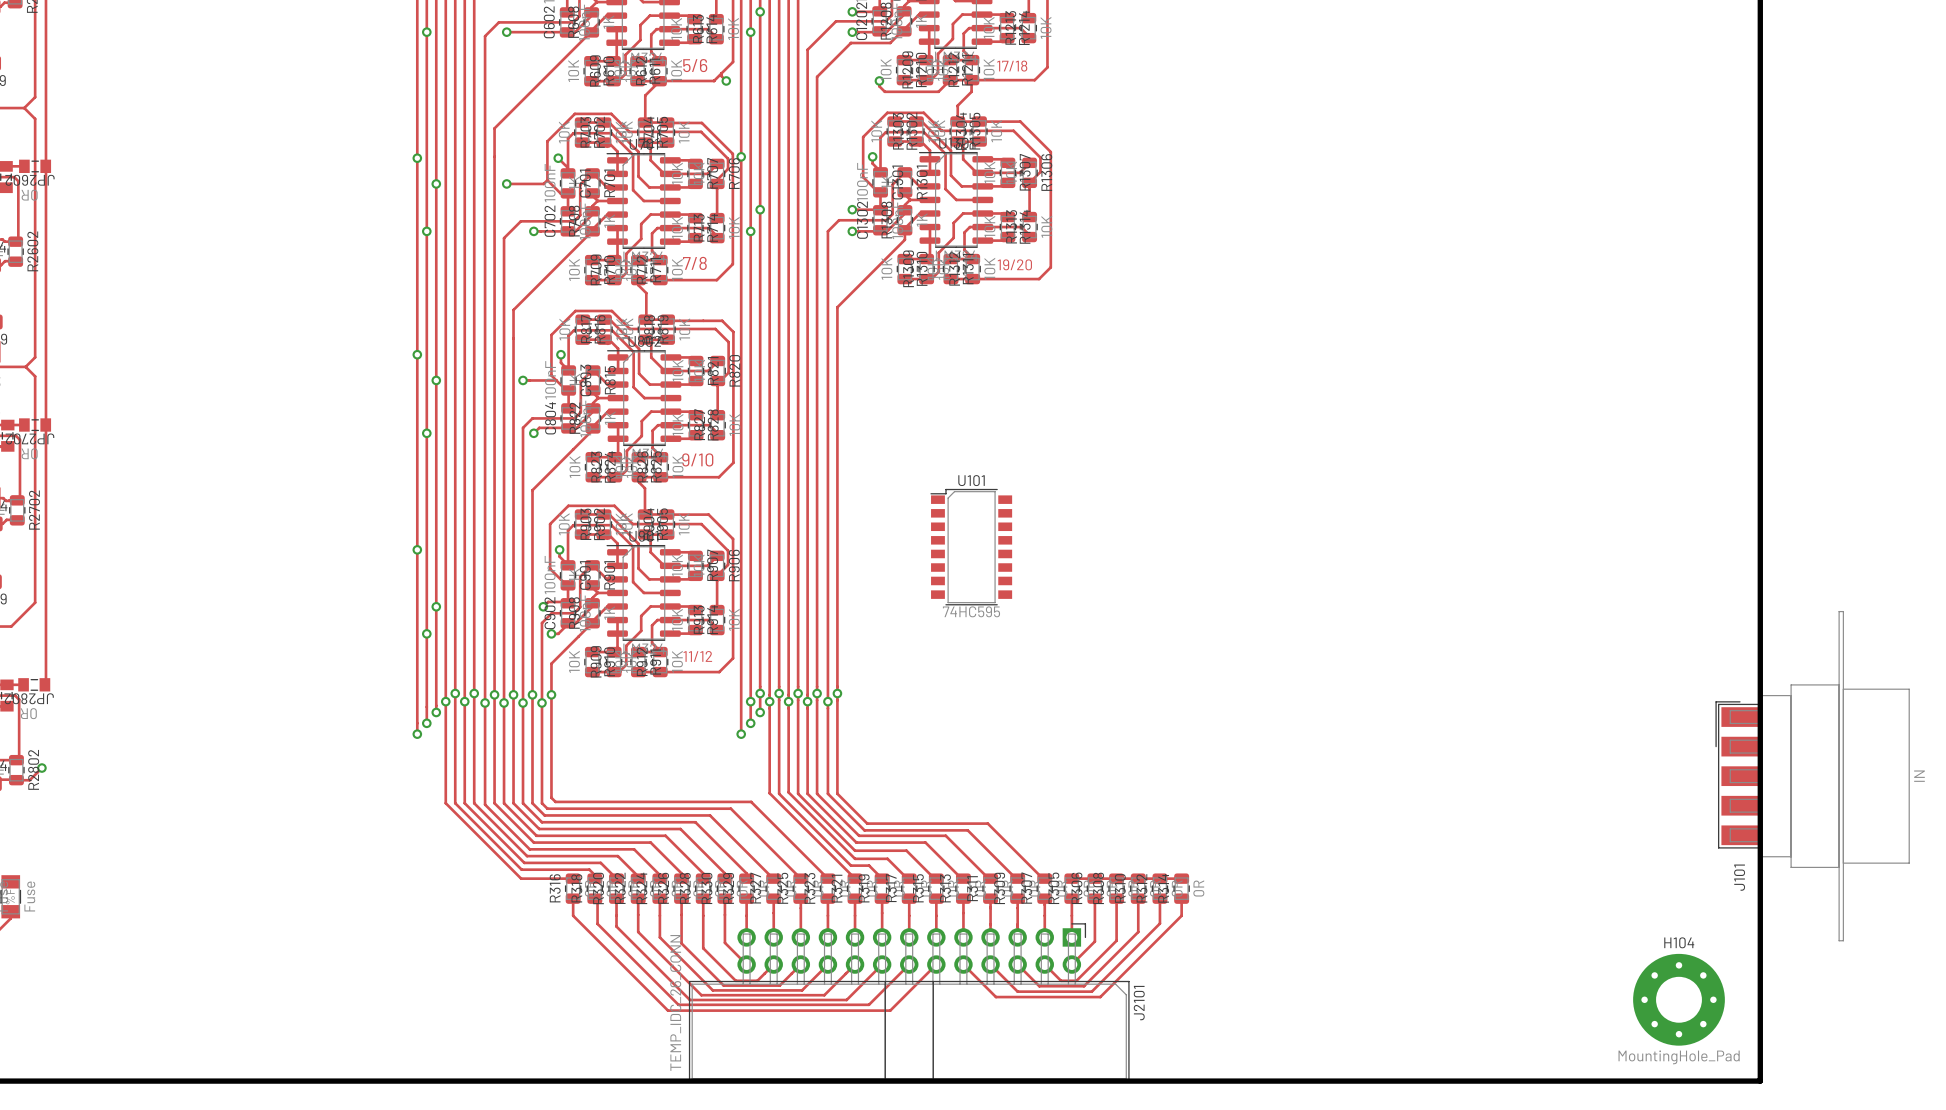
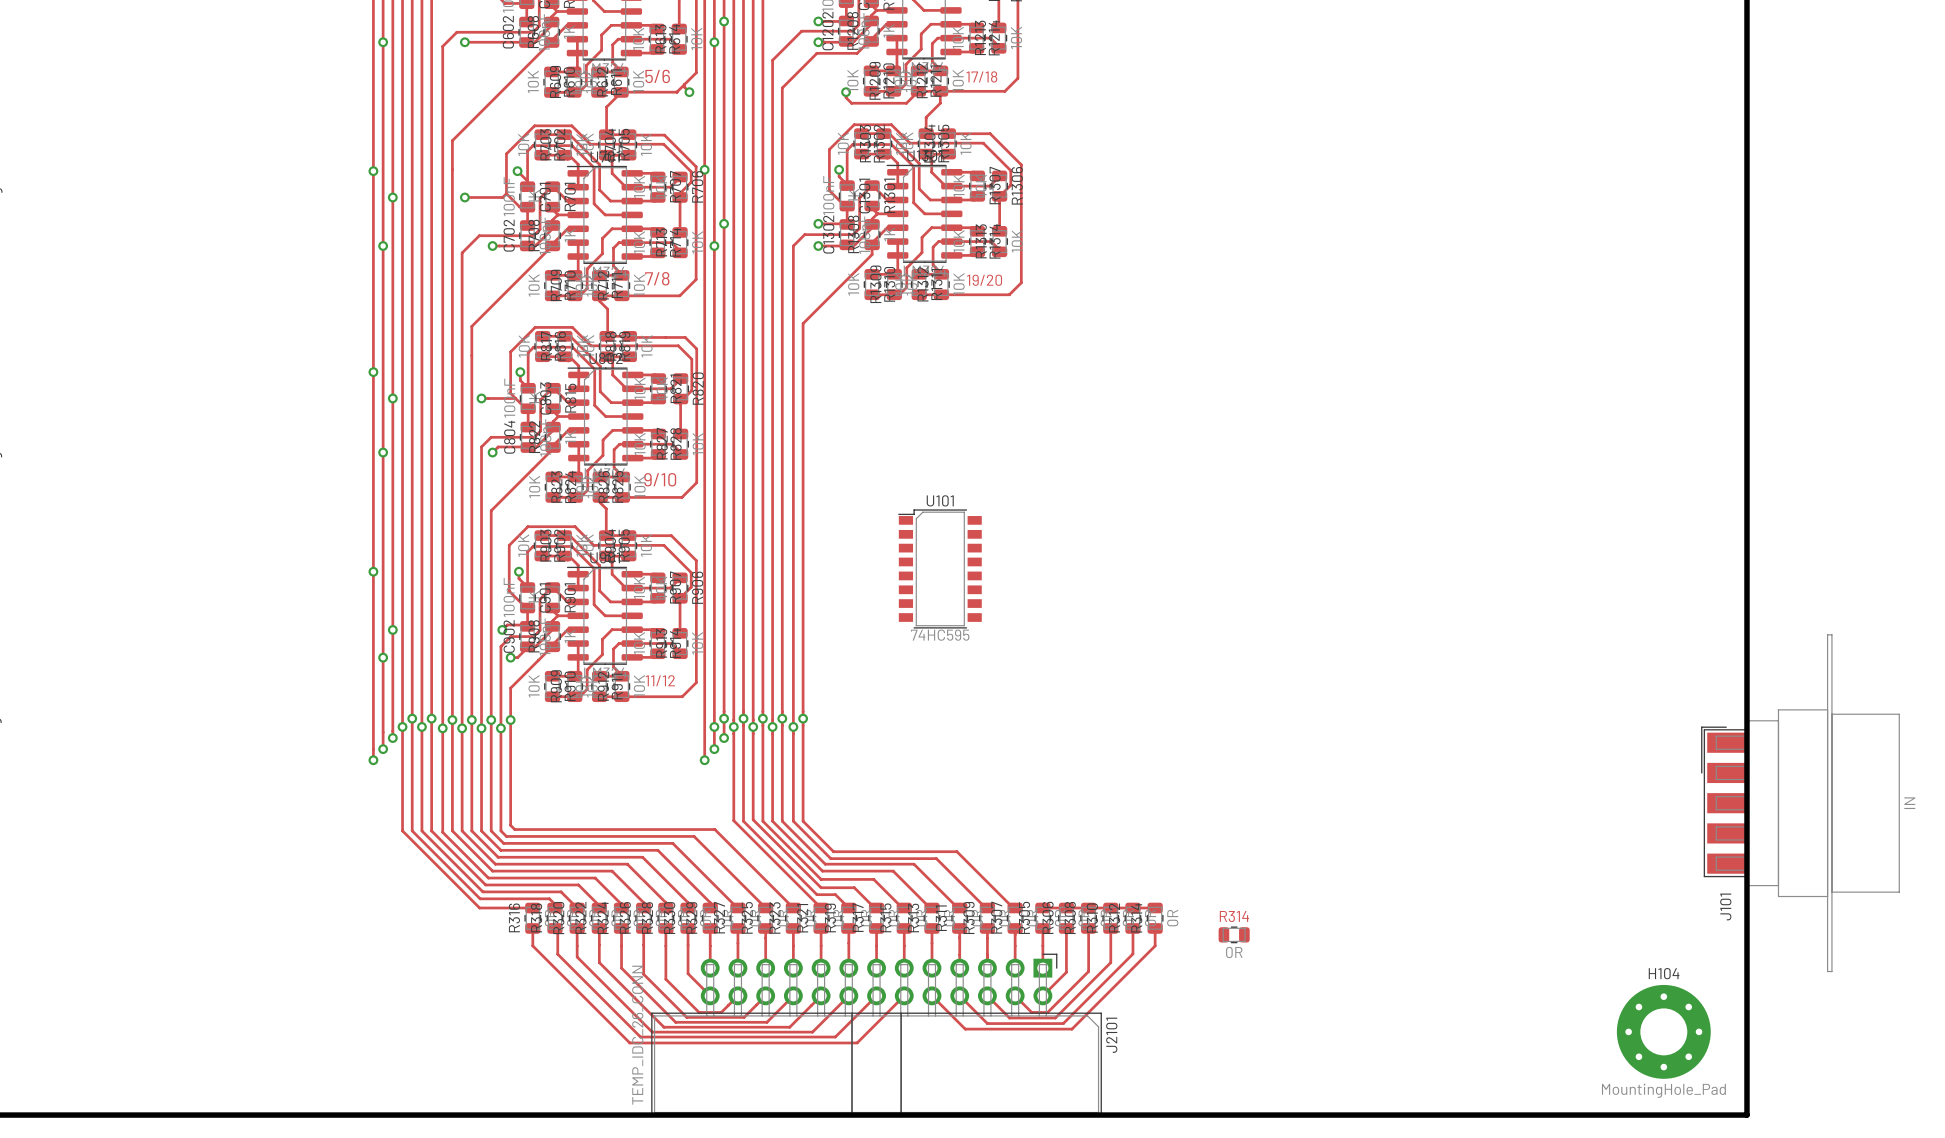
R314: none -> 0R (1234, 934)

